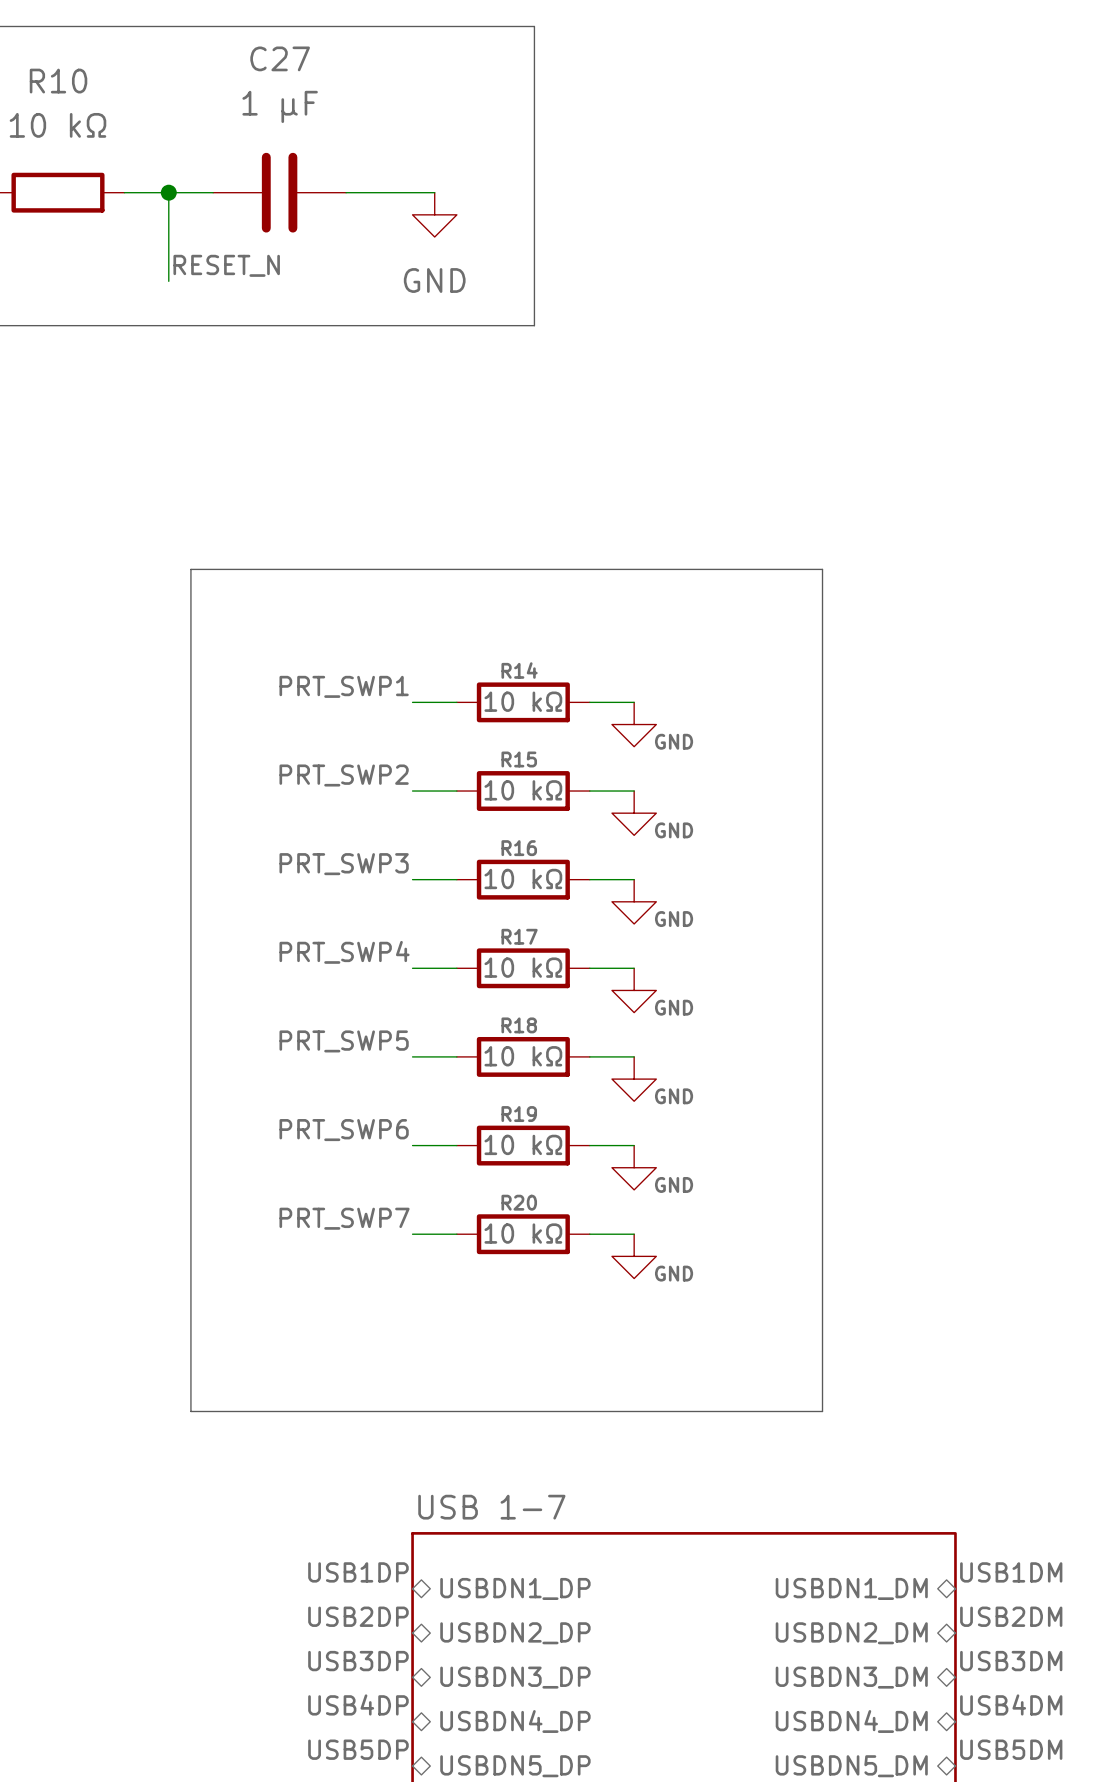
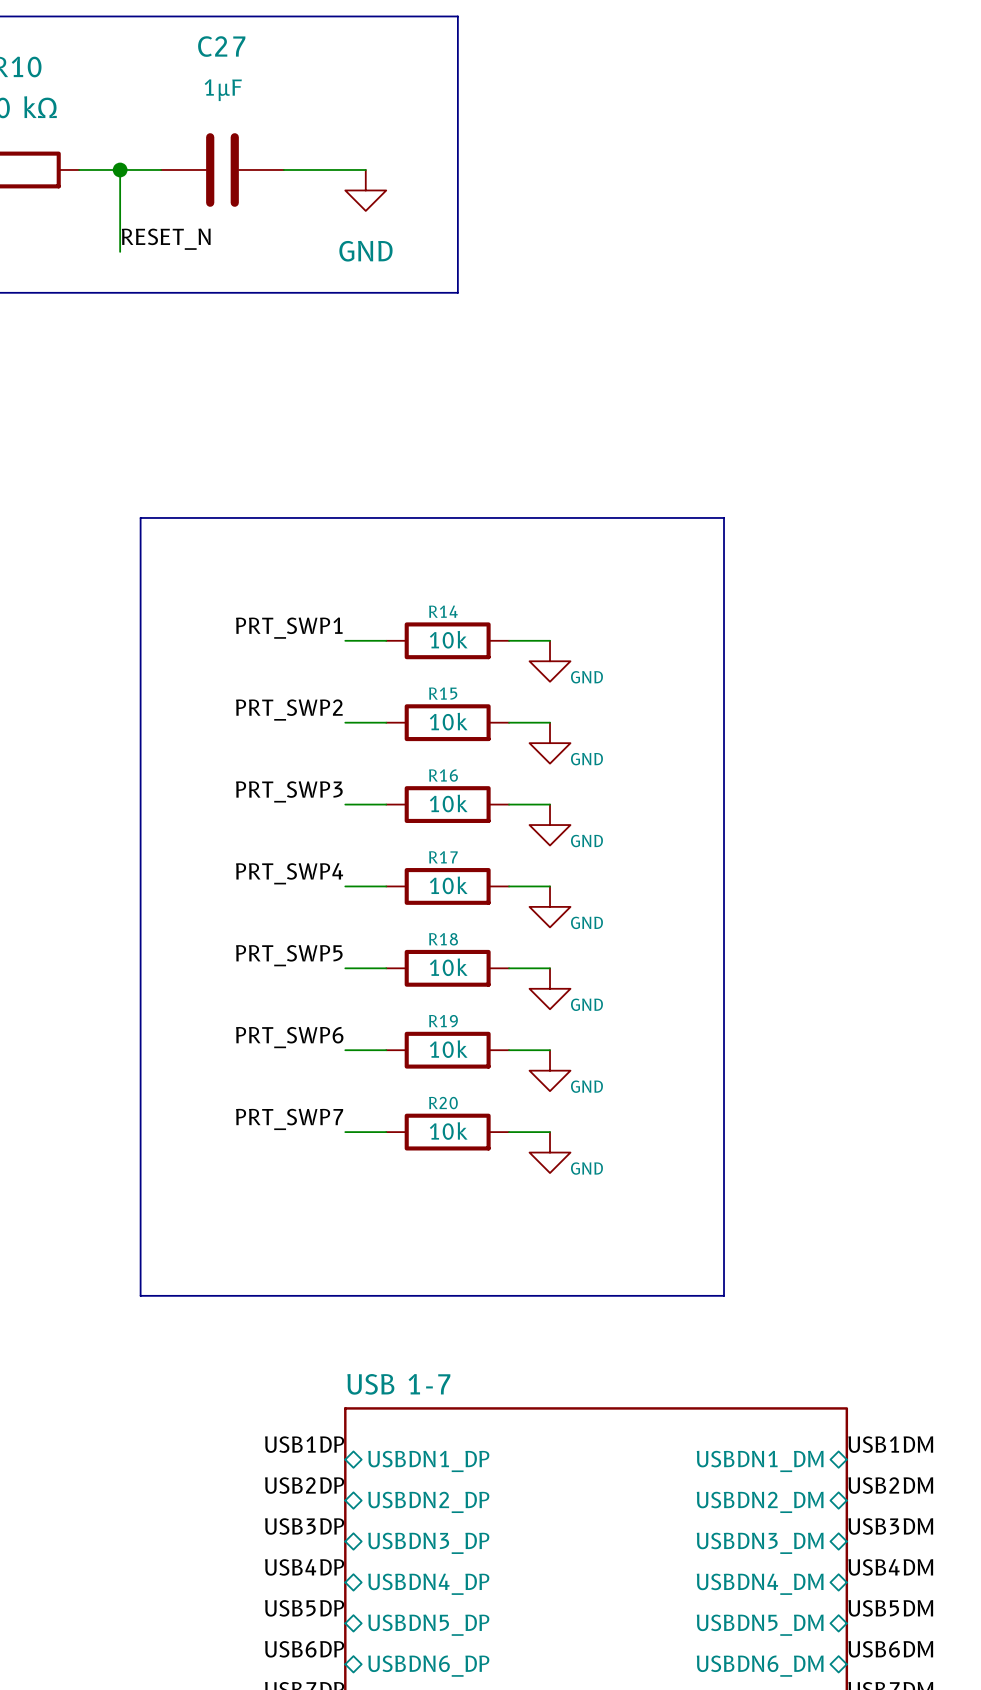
C27 value: 1 µF (280, 106) -> 1µF (223, 90)
R14 value: 10 kΩ (523, 701) -> 10k (448, 639)
R15 value: 10 kΩ (523, 790) -> 10k (448, 721)
R16 value: 10 kΩ (523, 878) -> 10k (448, 803)
R17 value: 10 kΩ (523, 967) -> 10k (448, 885)
R18 value: 10 kΩ (523, 1056) -> 10k (448, 967)
R19 value: 10 kΩ (523, 1144) -> 10k (448, 1049)
R20 value: 10 kΩ (523, 1233) -> 10k (448, 1131)

